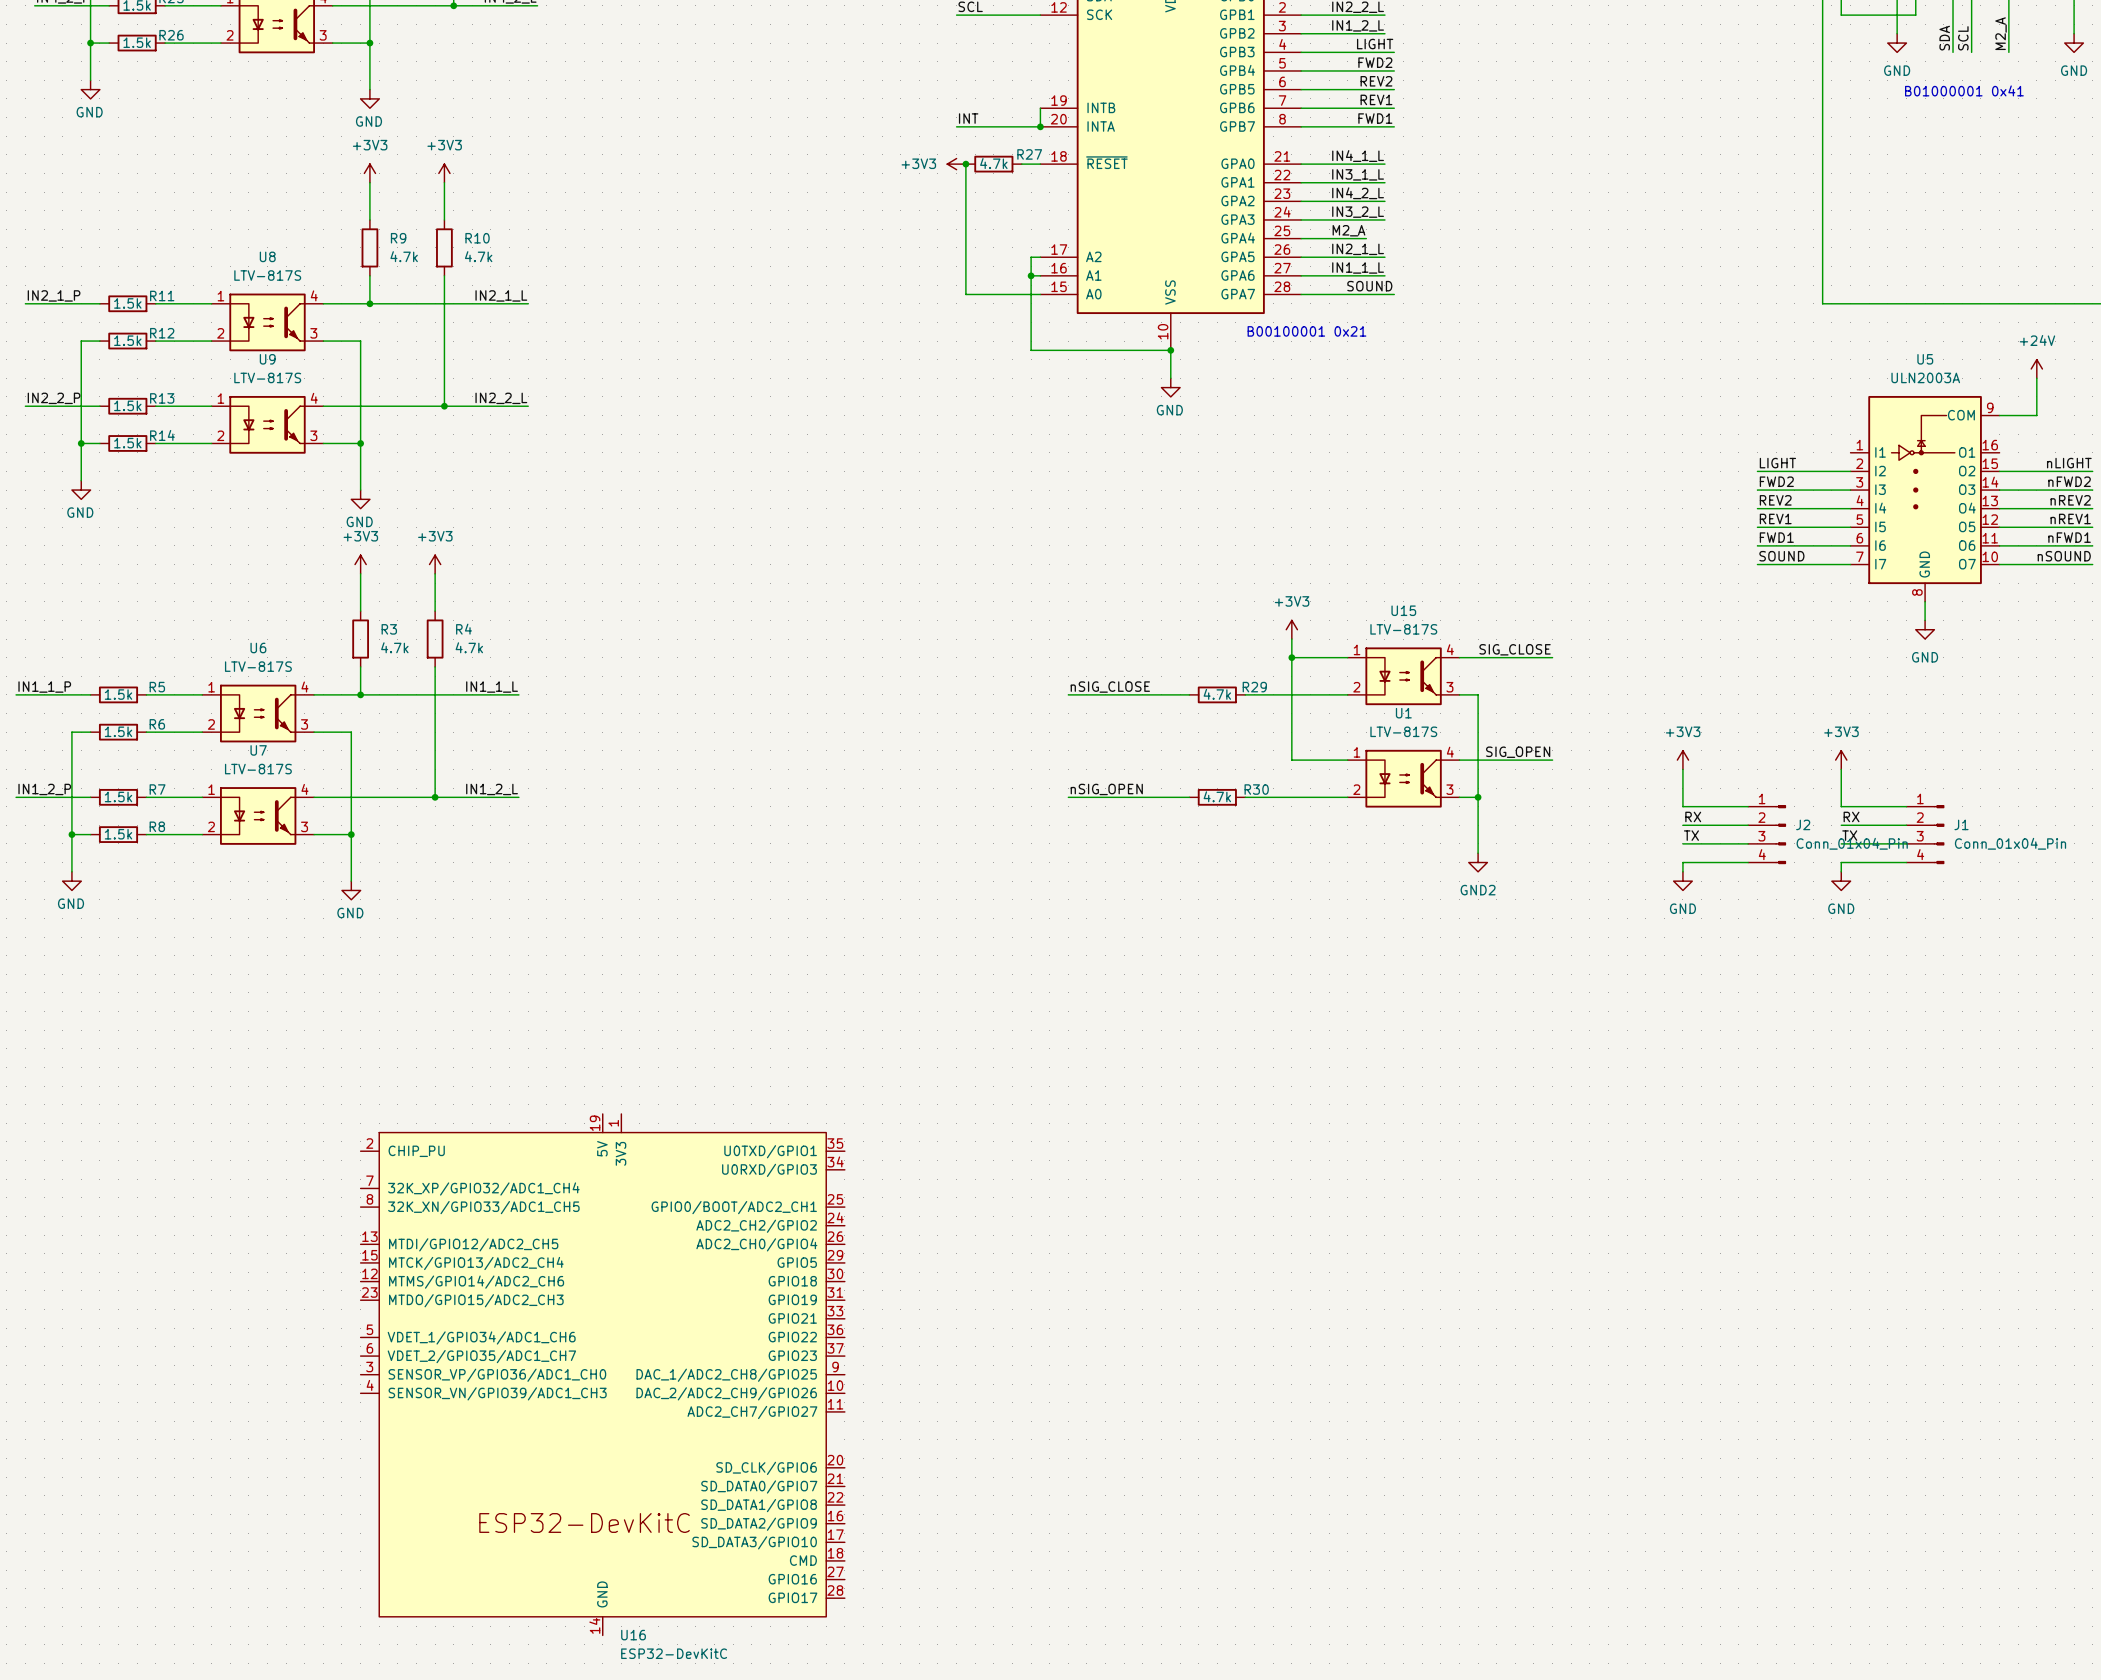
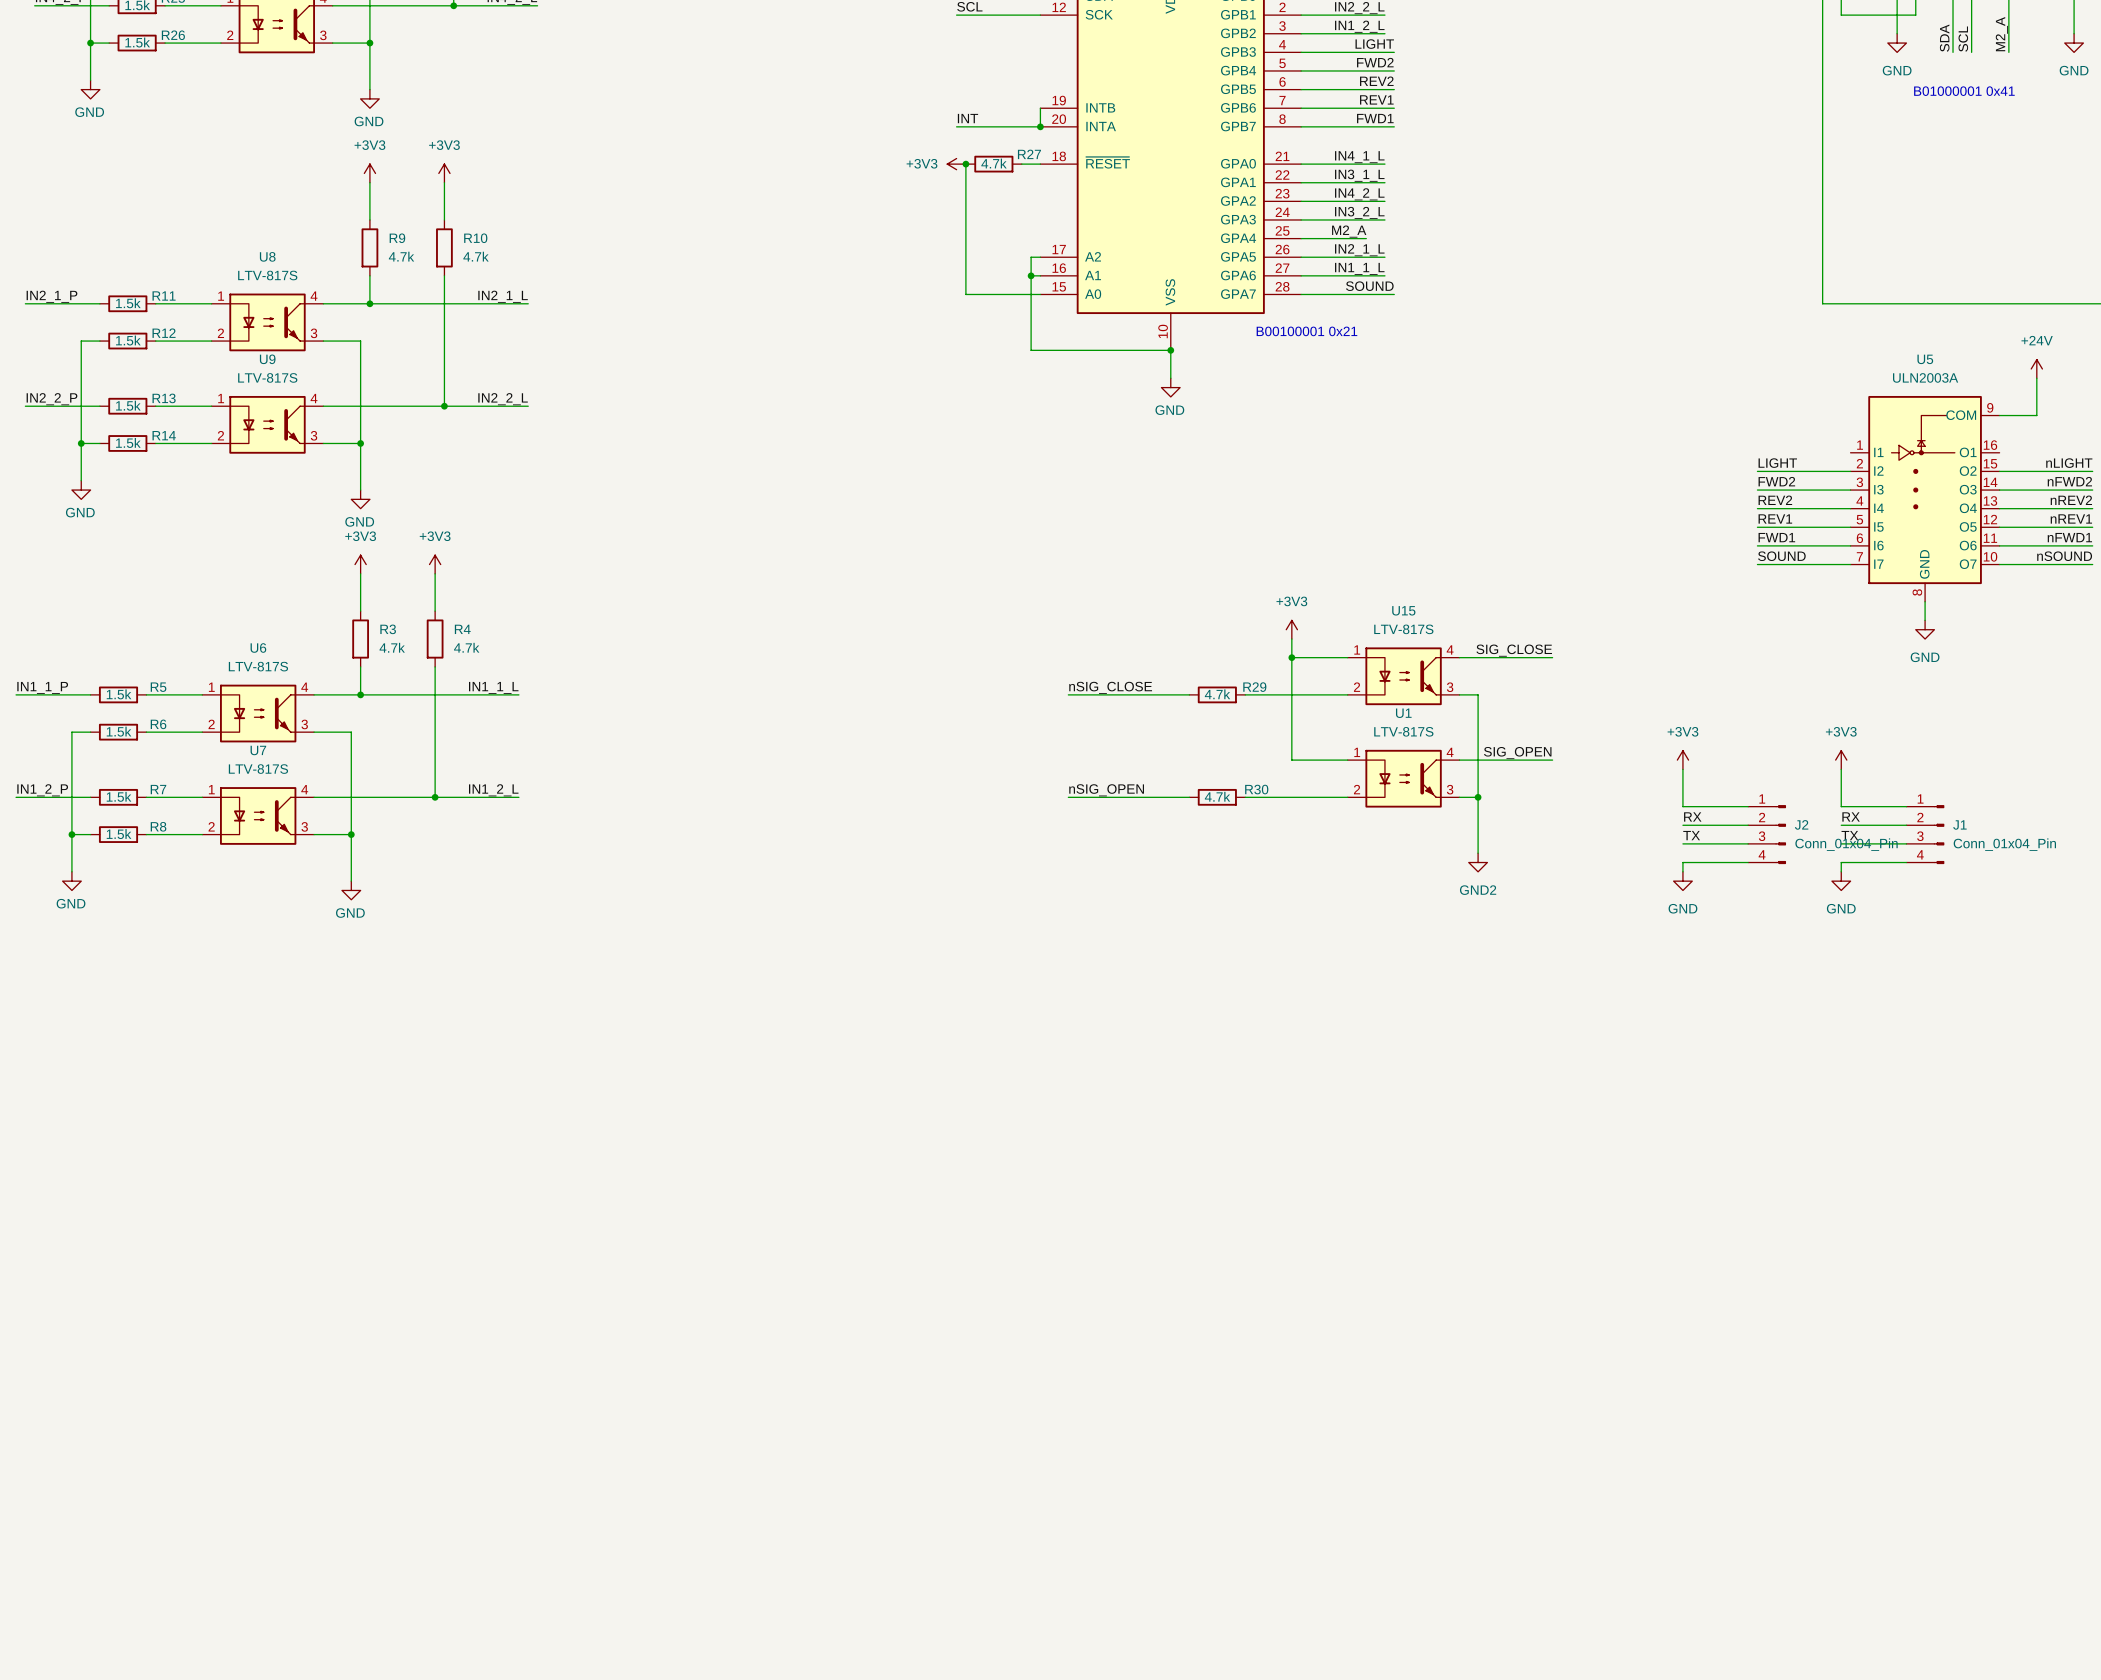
U16: ESP32-DevKitC (602, 1374) -> none

